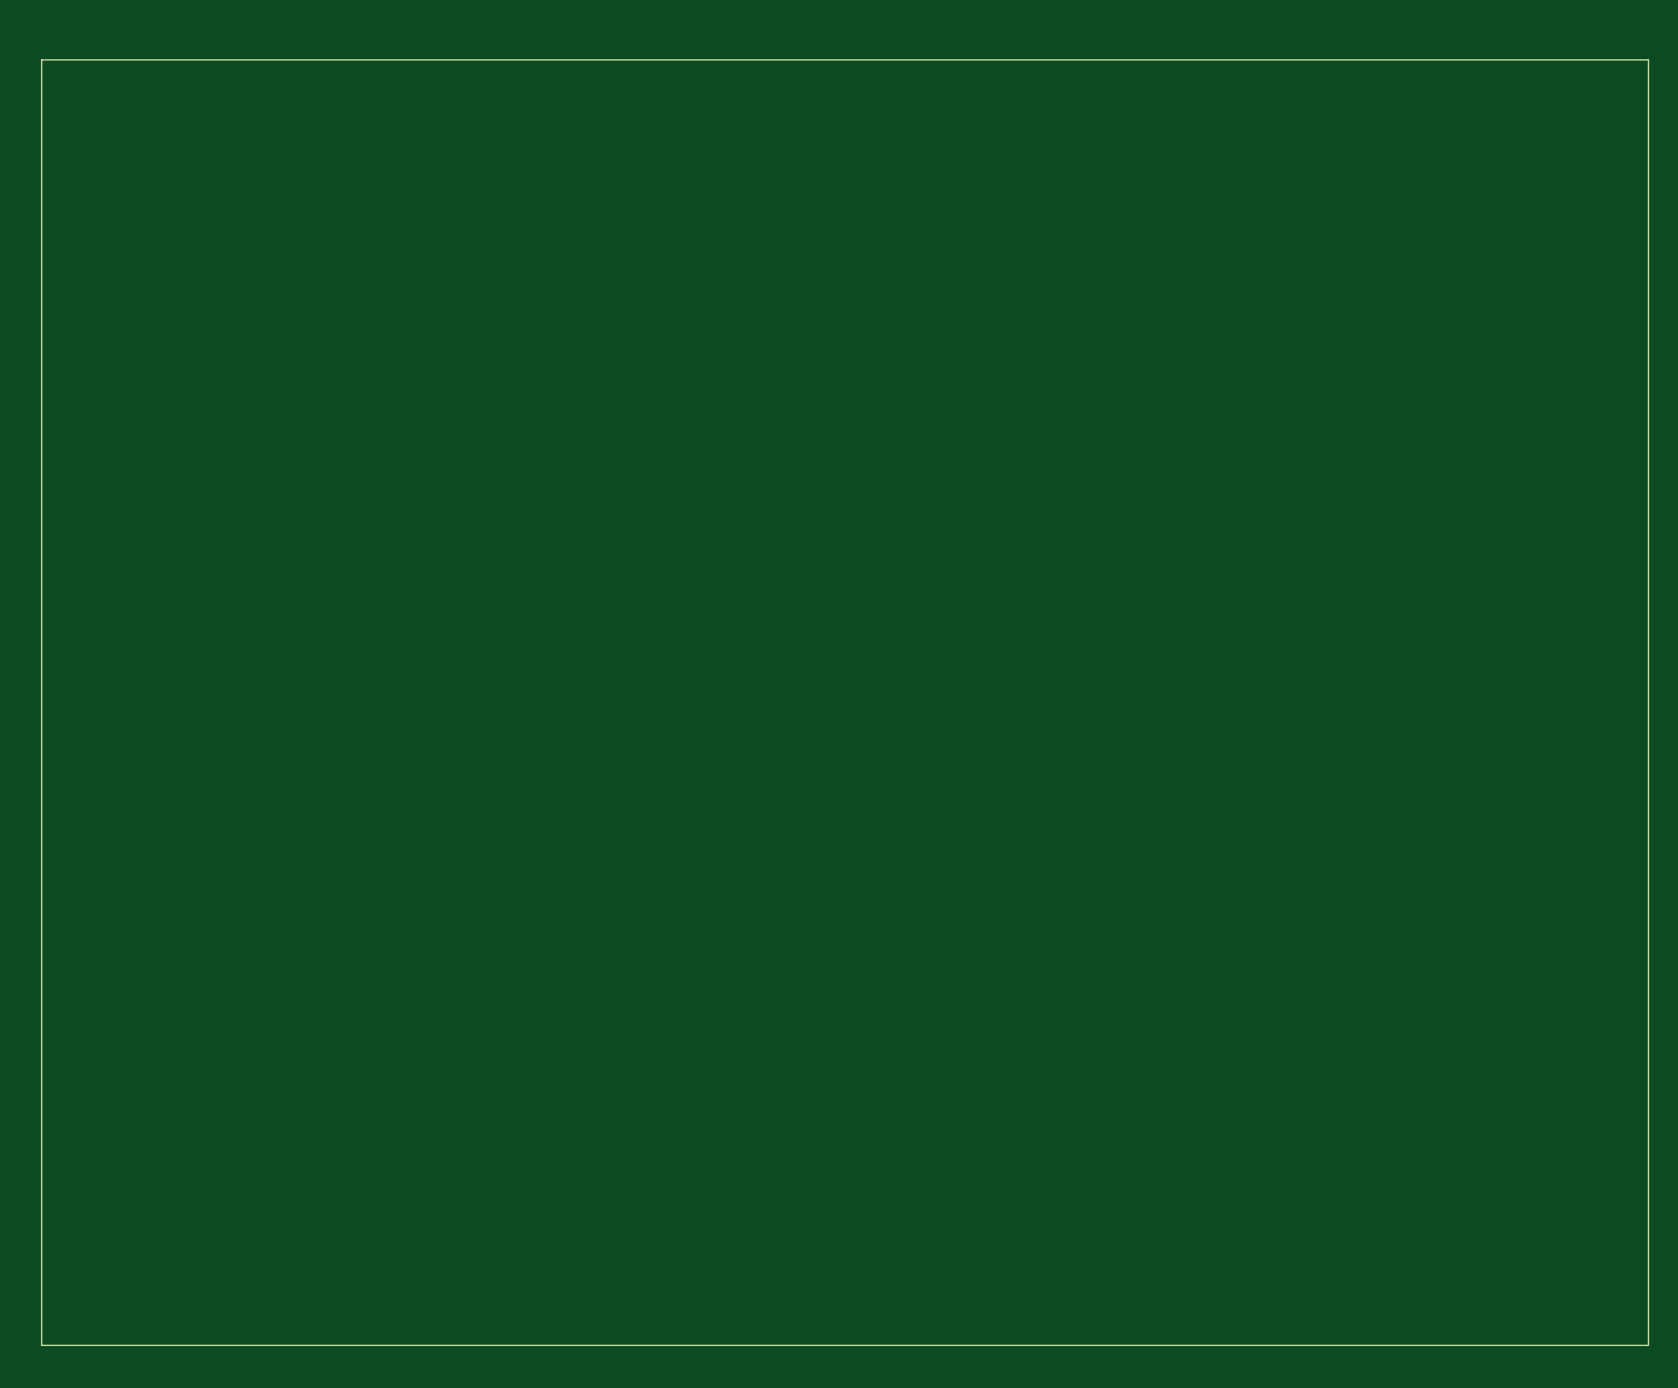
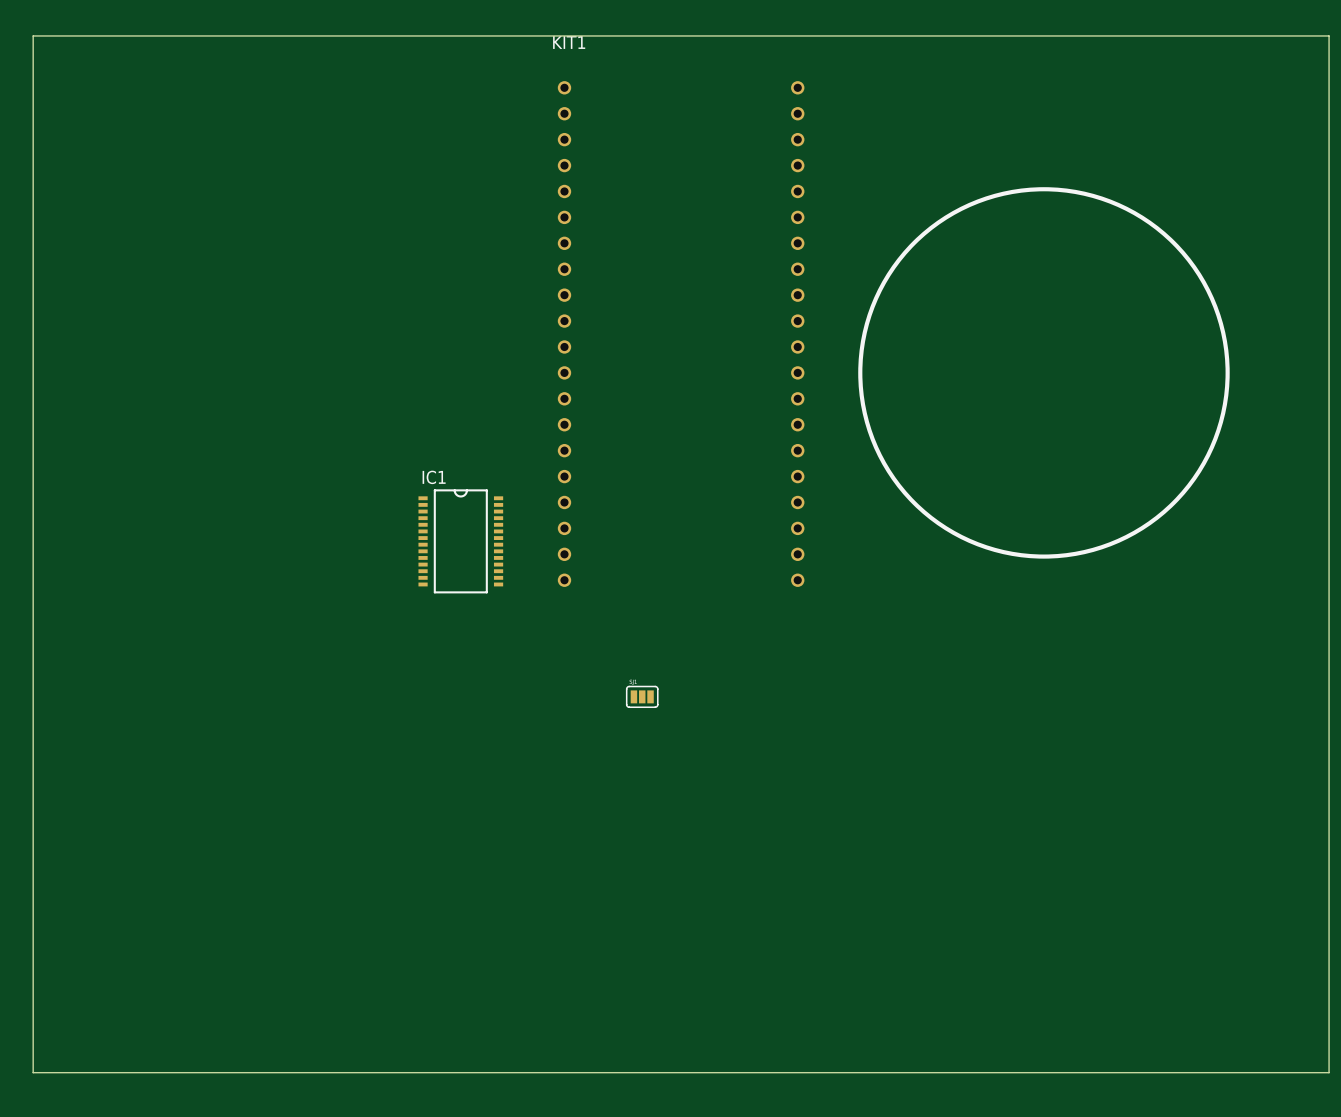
drawing: none -> [858, 187, 1230, 559]
KIT1: none -> (681, 334)
IC1: none -> (460, 541)
part: none -> (642, 696)

